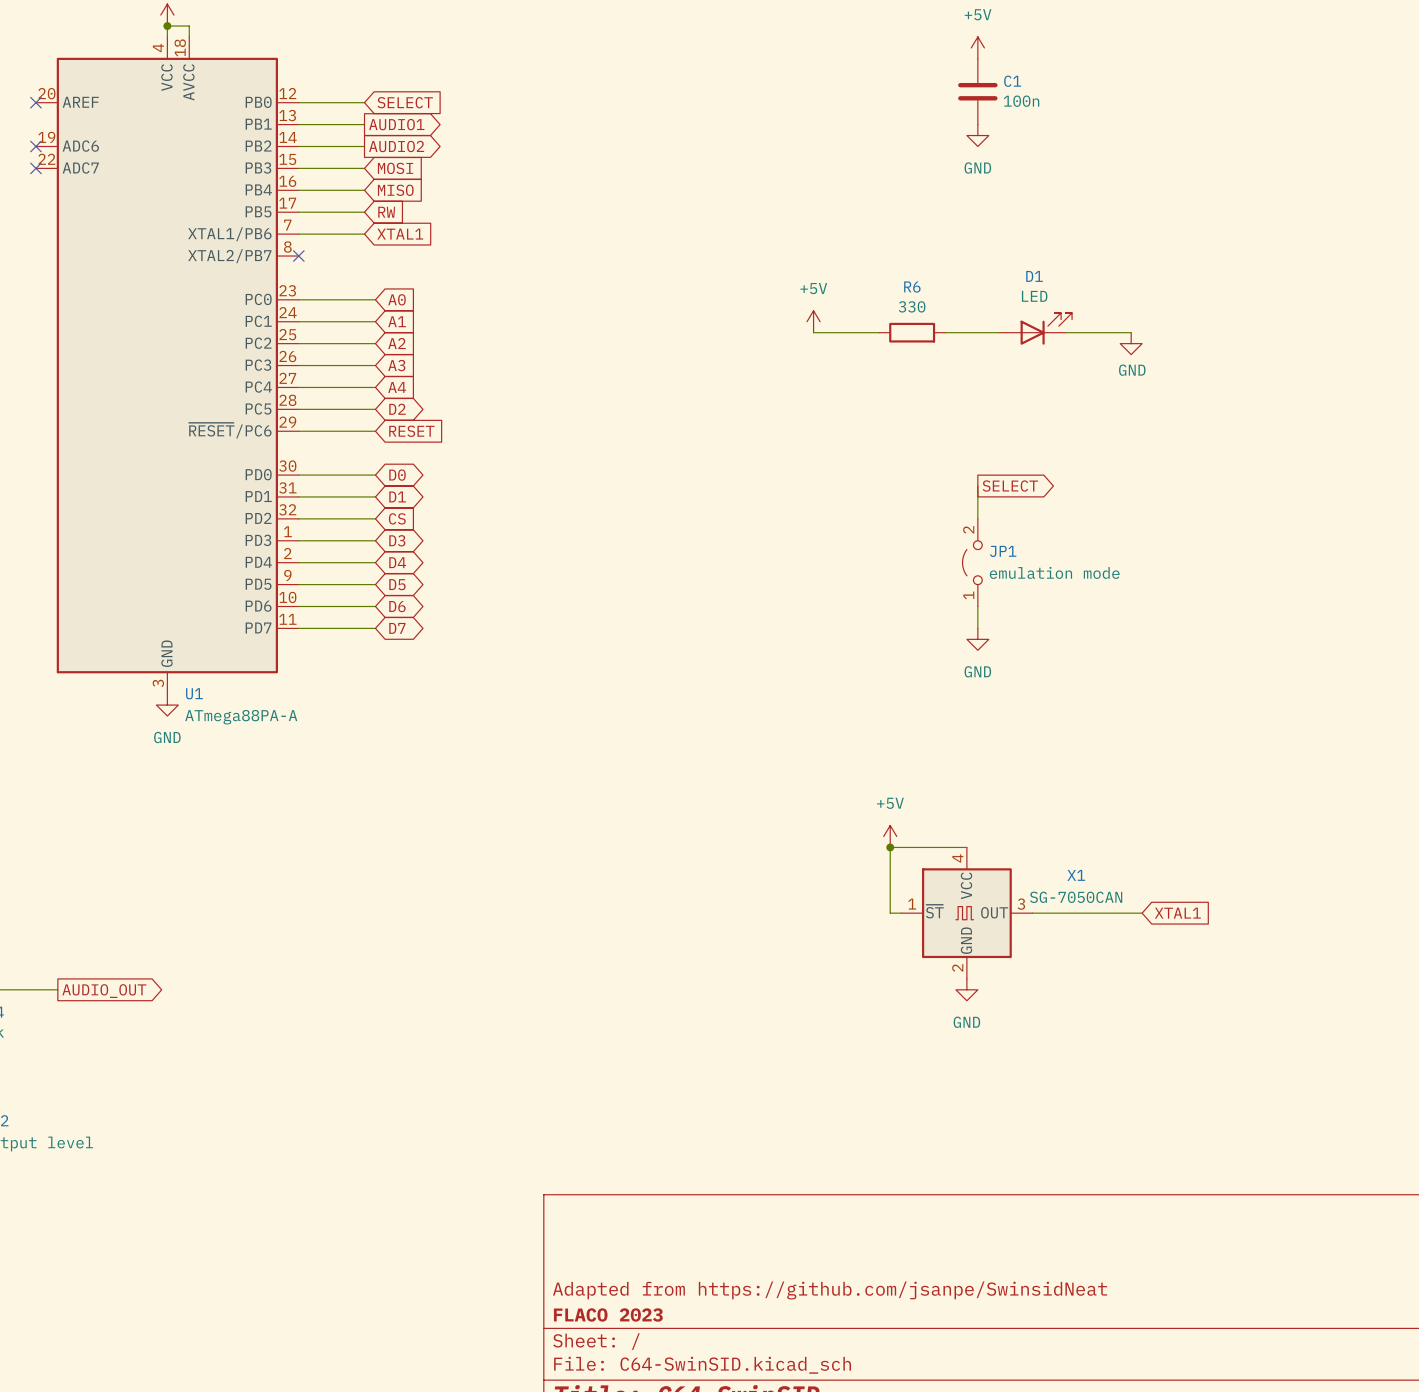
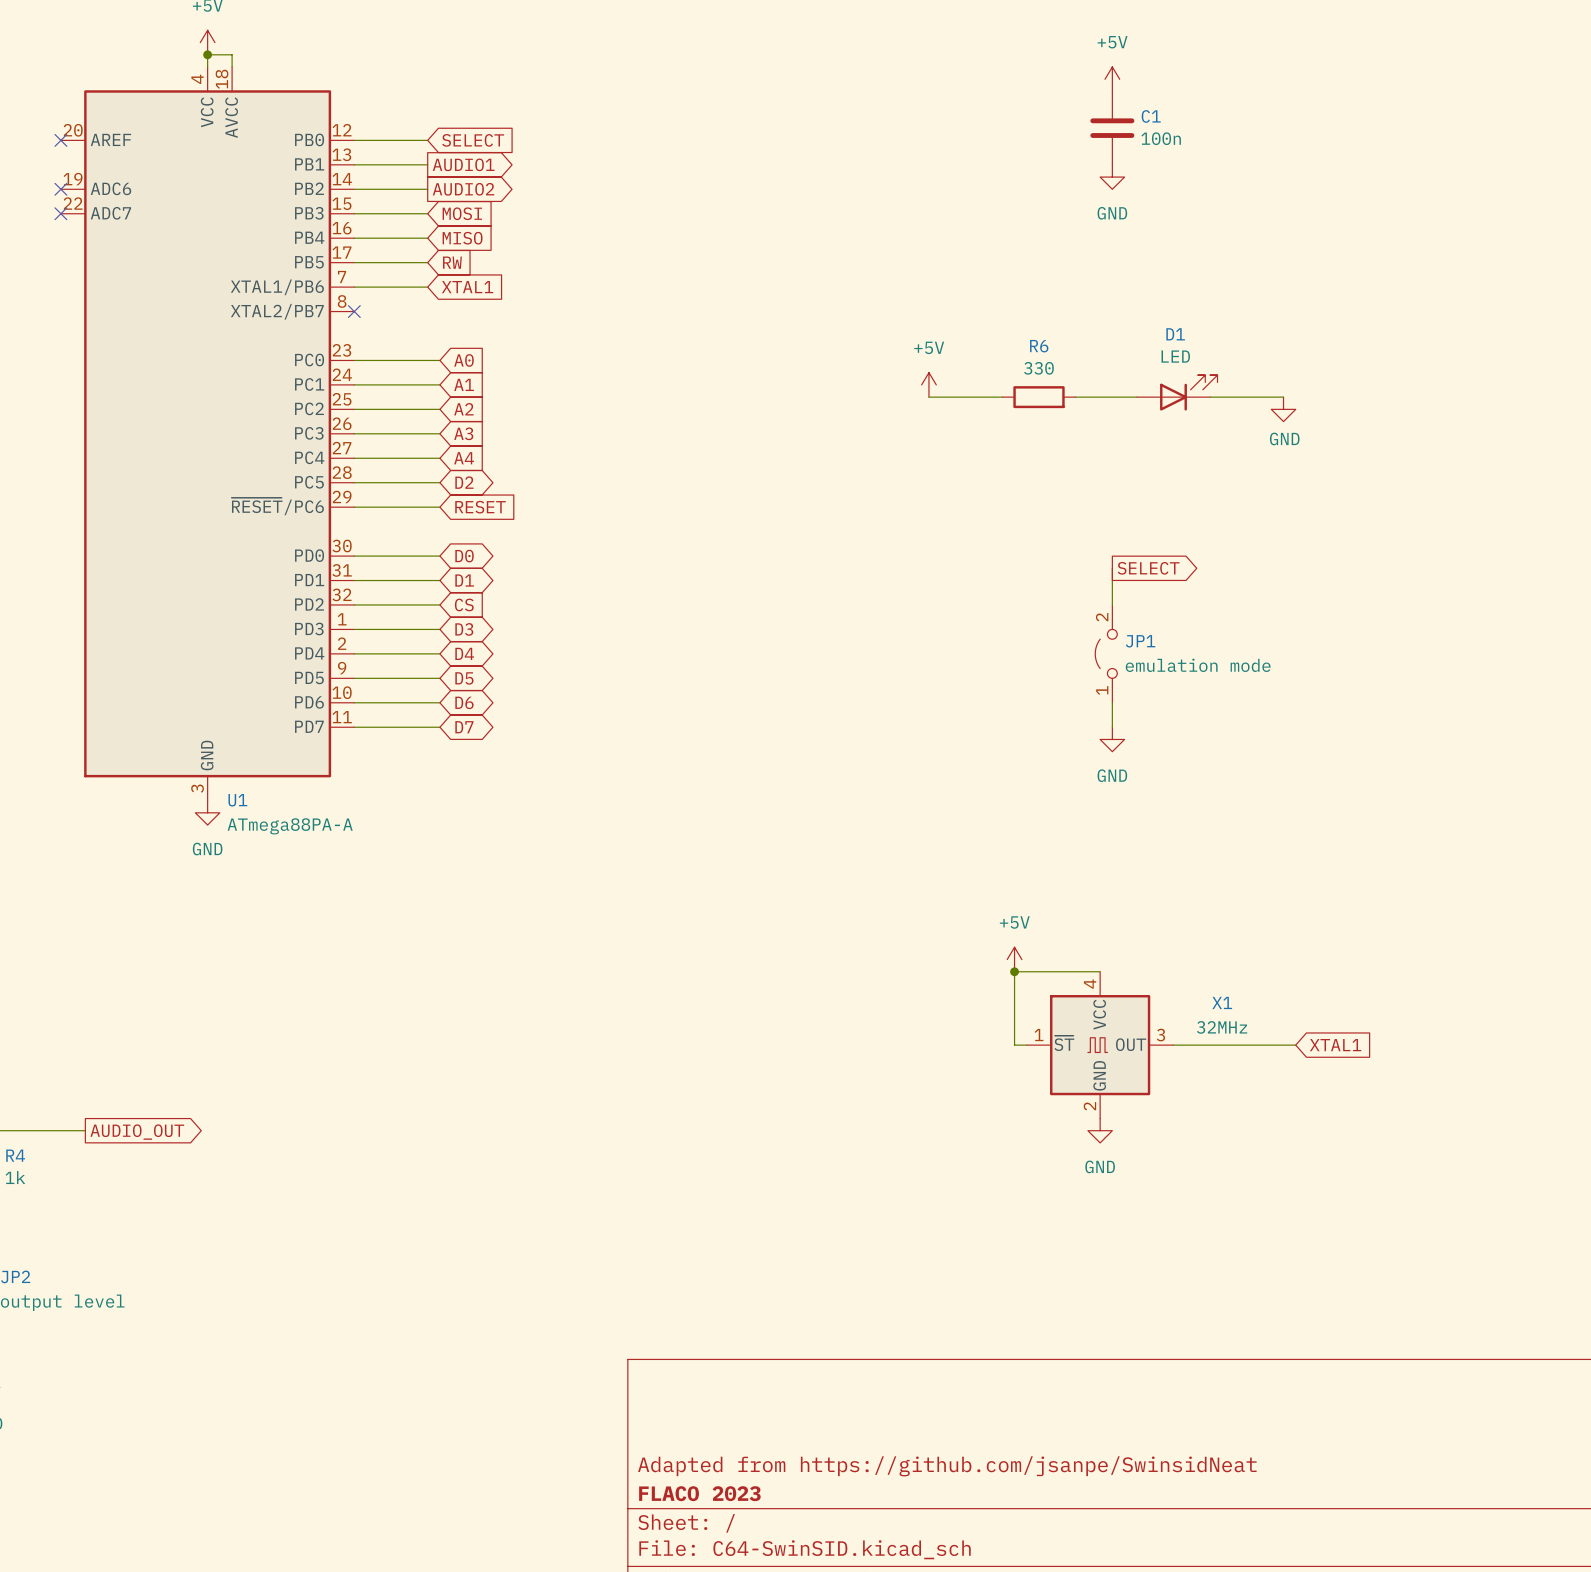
X1 value: SG-7050CAN (1076, 897) -> 32MHz (1222, 1027)

